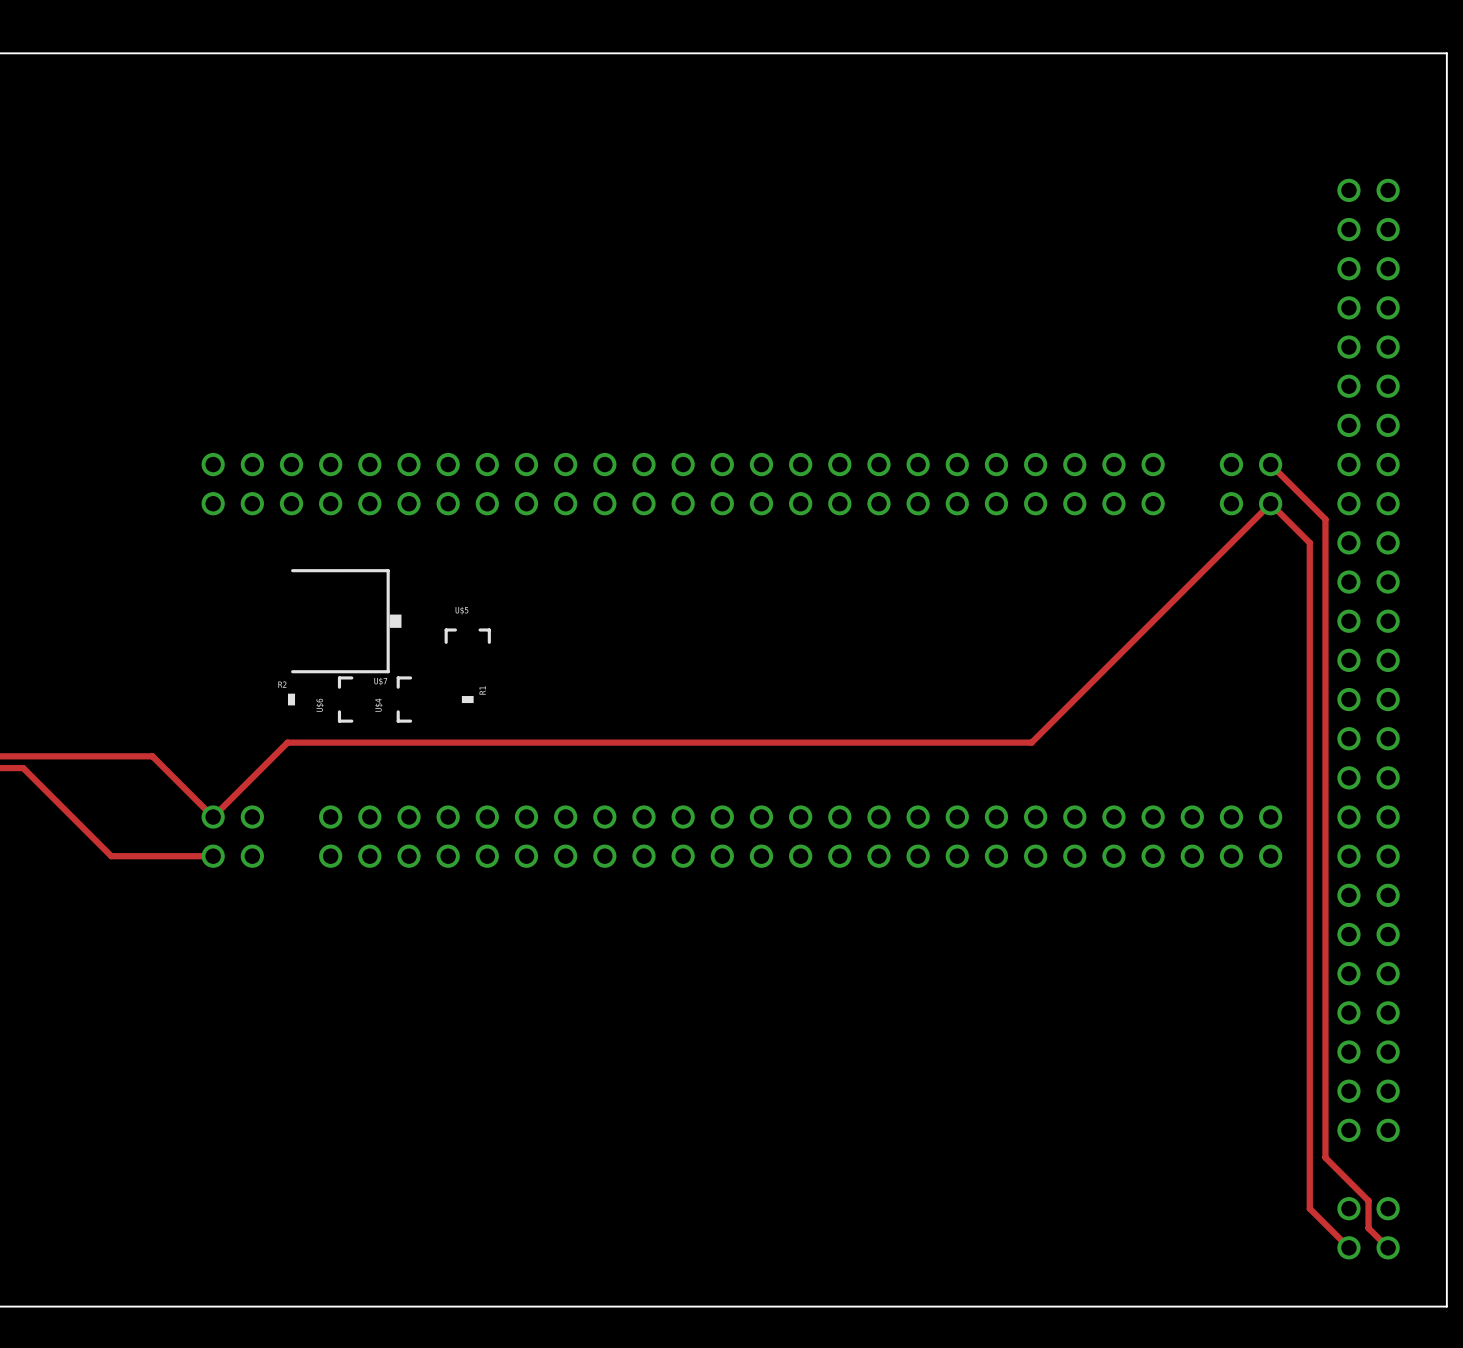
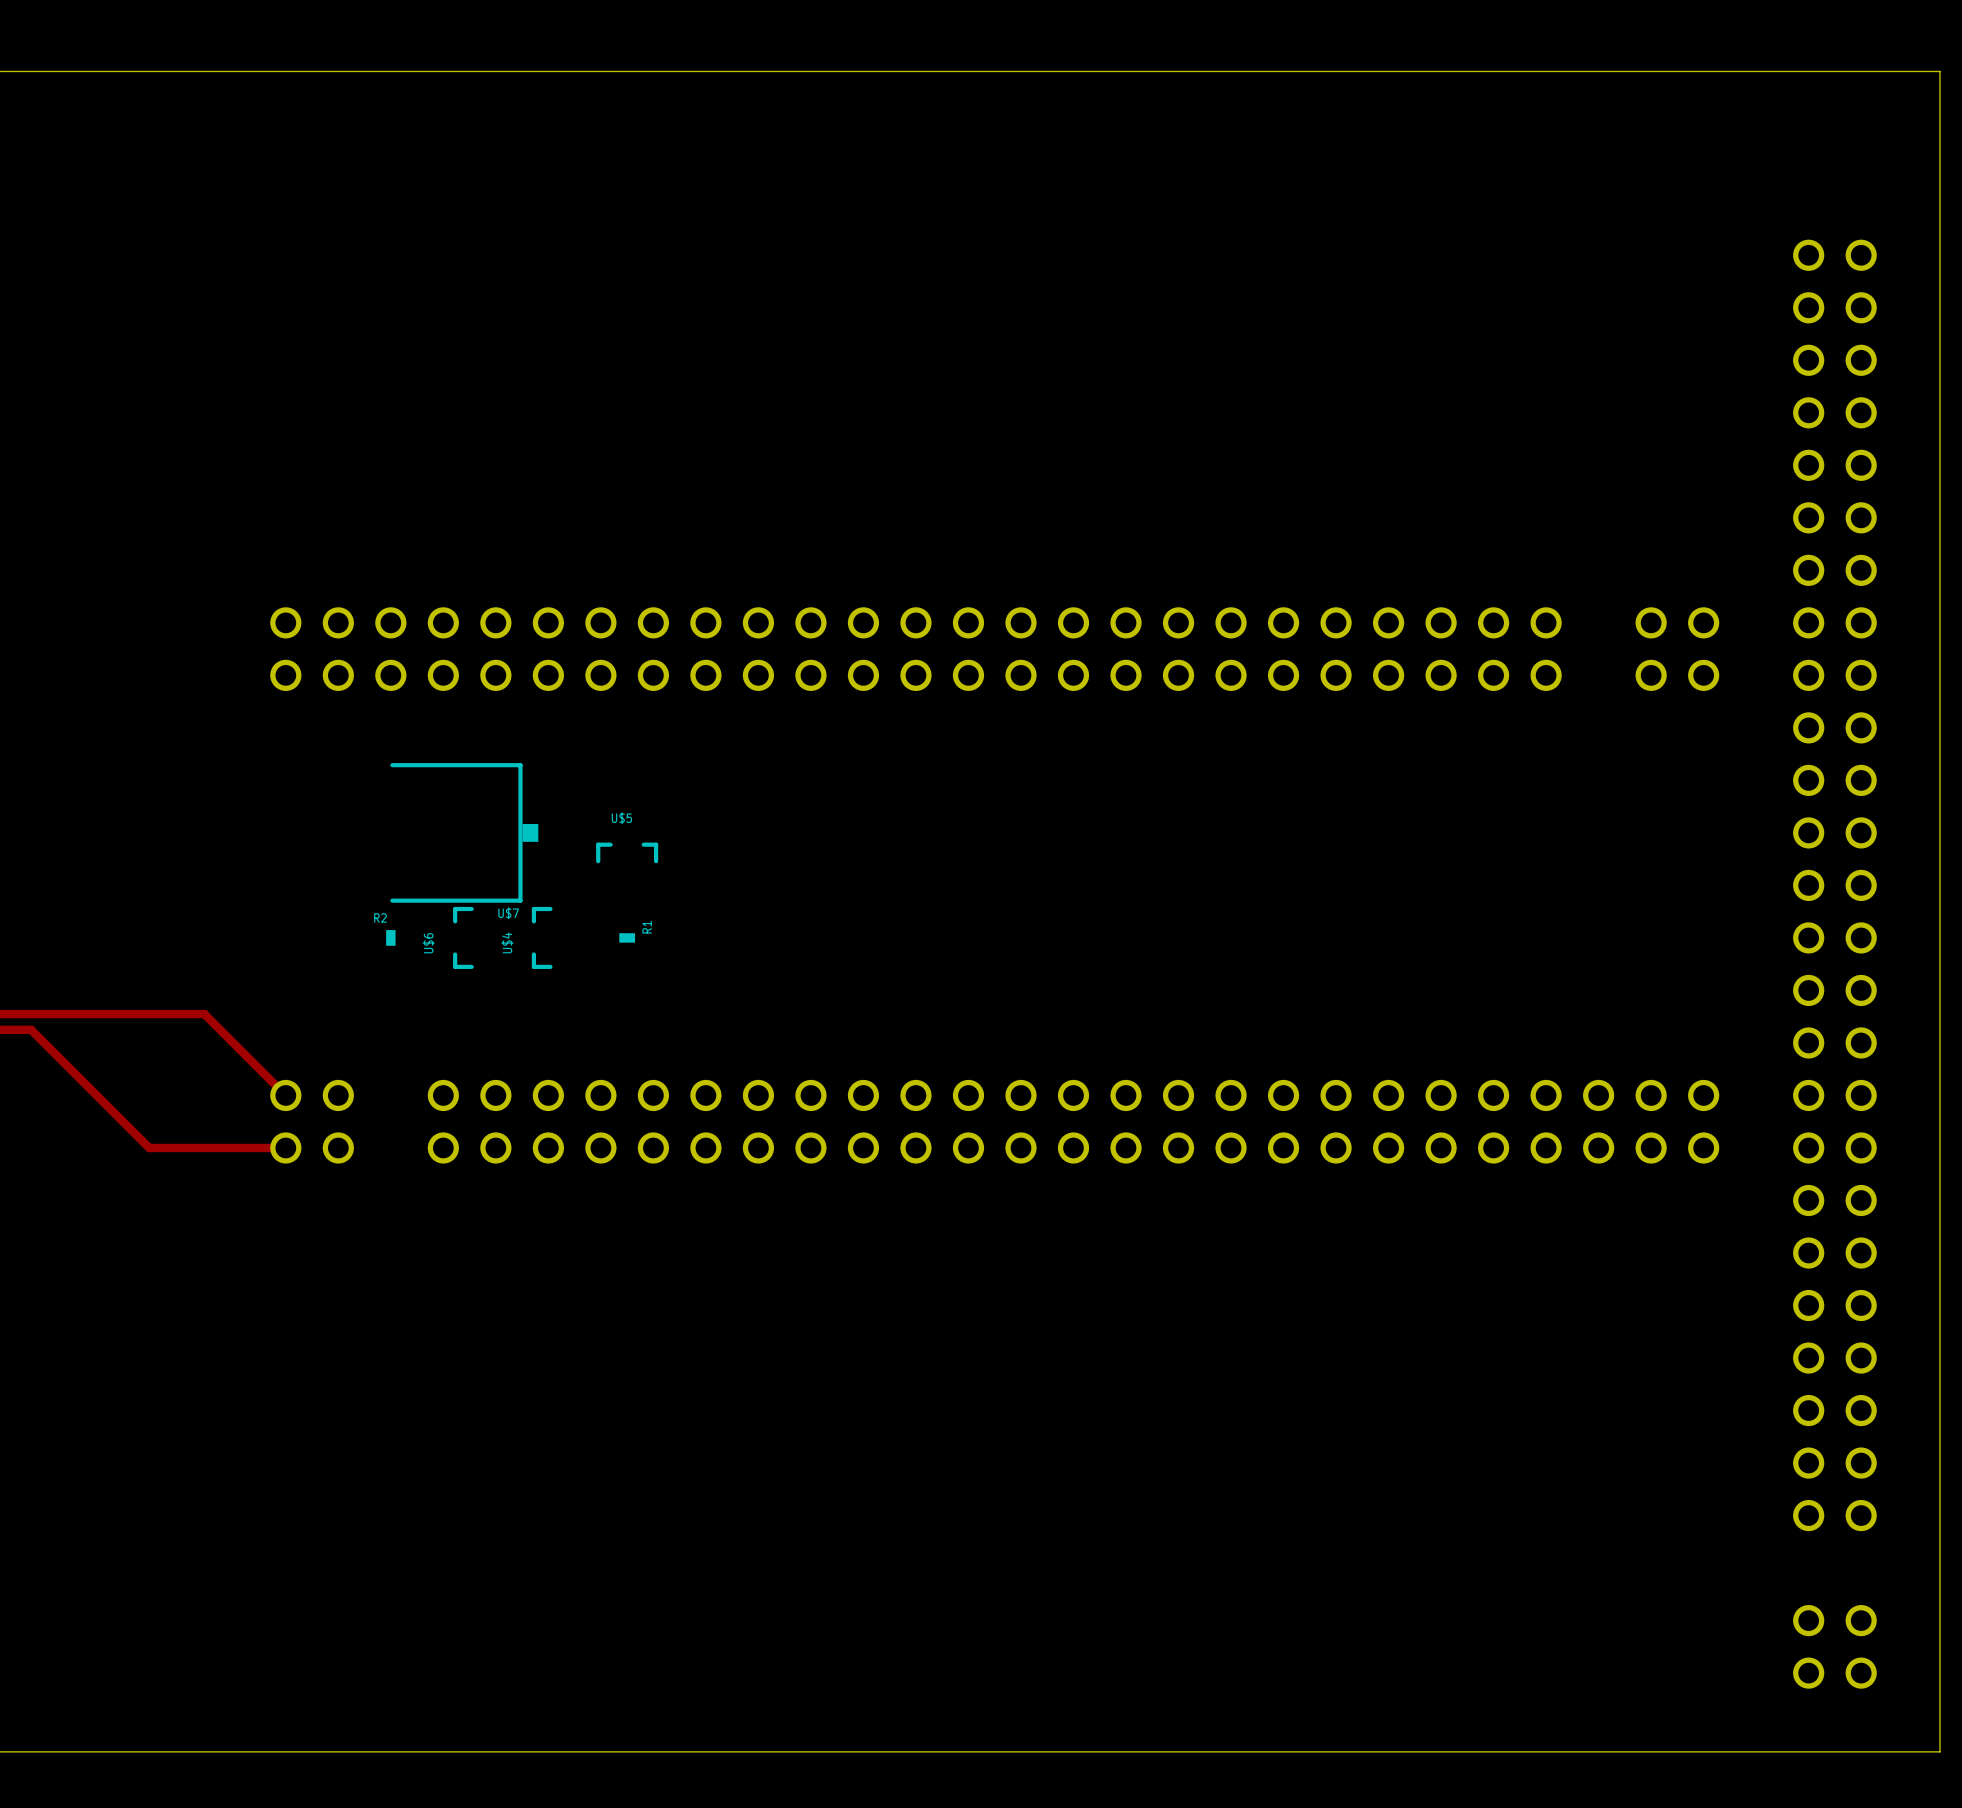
track: (1270, 464) (1325, 519) (1325, 1157) (1368, 1200) (1368, 1228) (1388, 1247) -> none
track: (213, 817) (287, 742) (1031, 742) (1270, 503) (1309, 542) (1309, 1208) (1348, 1247) -> none

